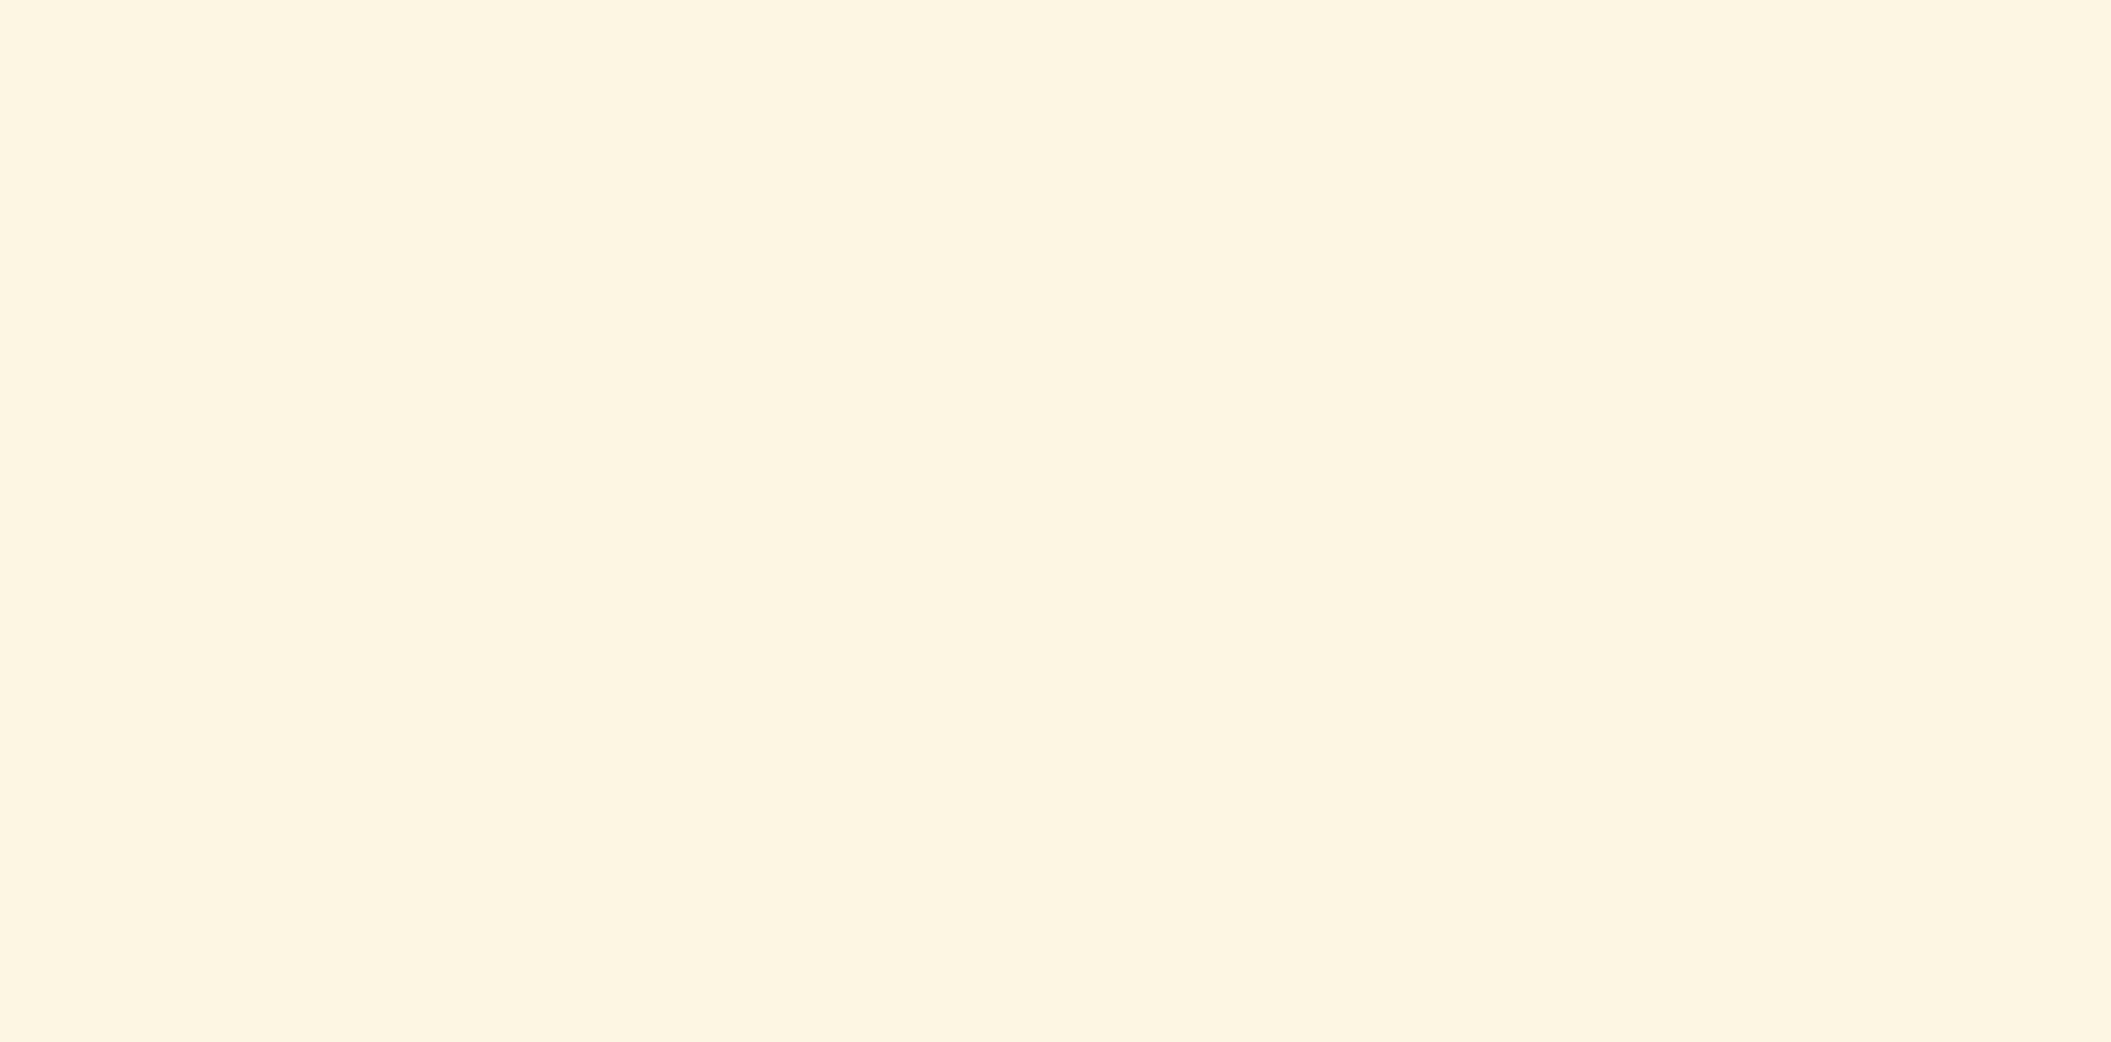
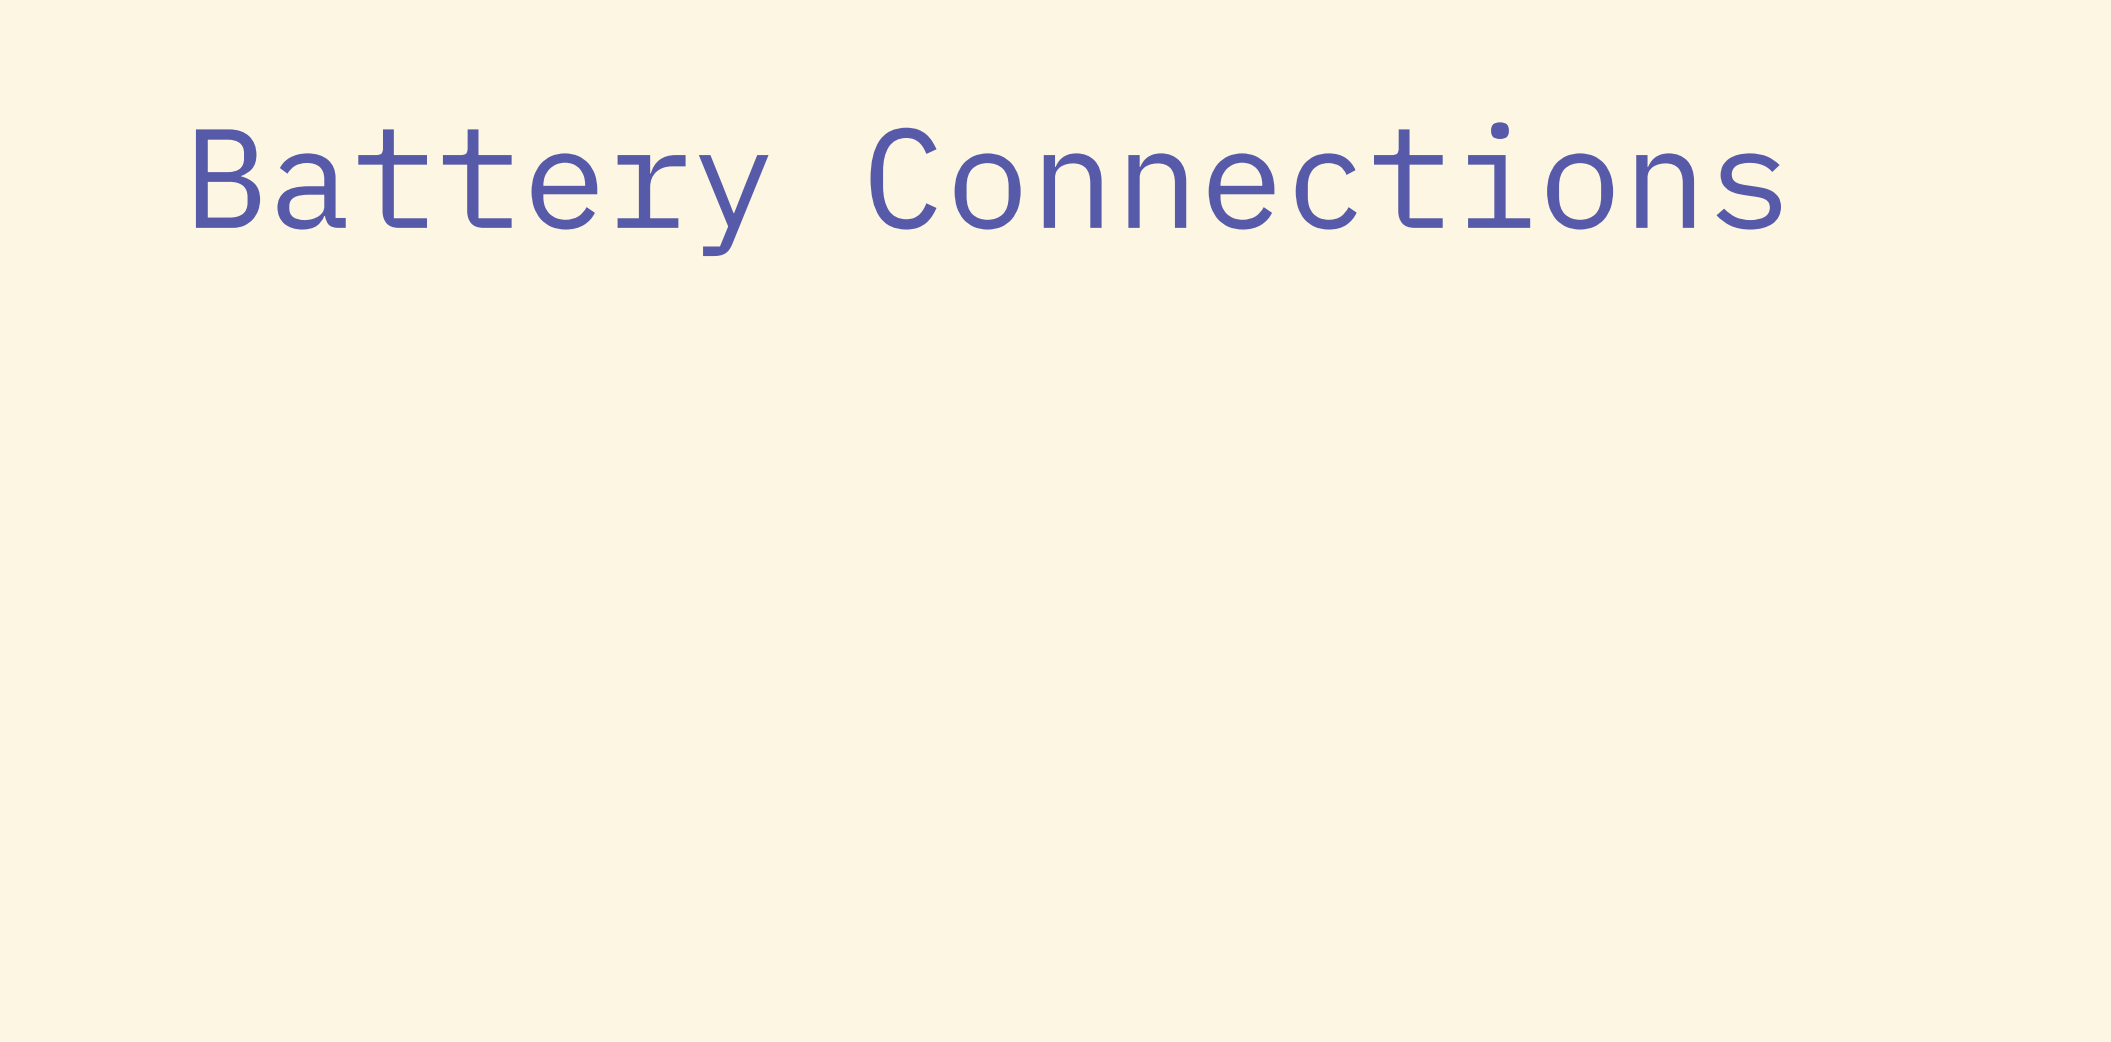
text: none -> Battery Connections (988, 189)

